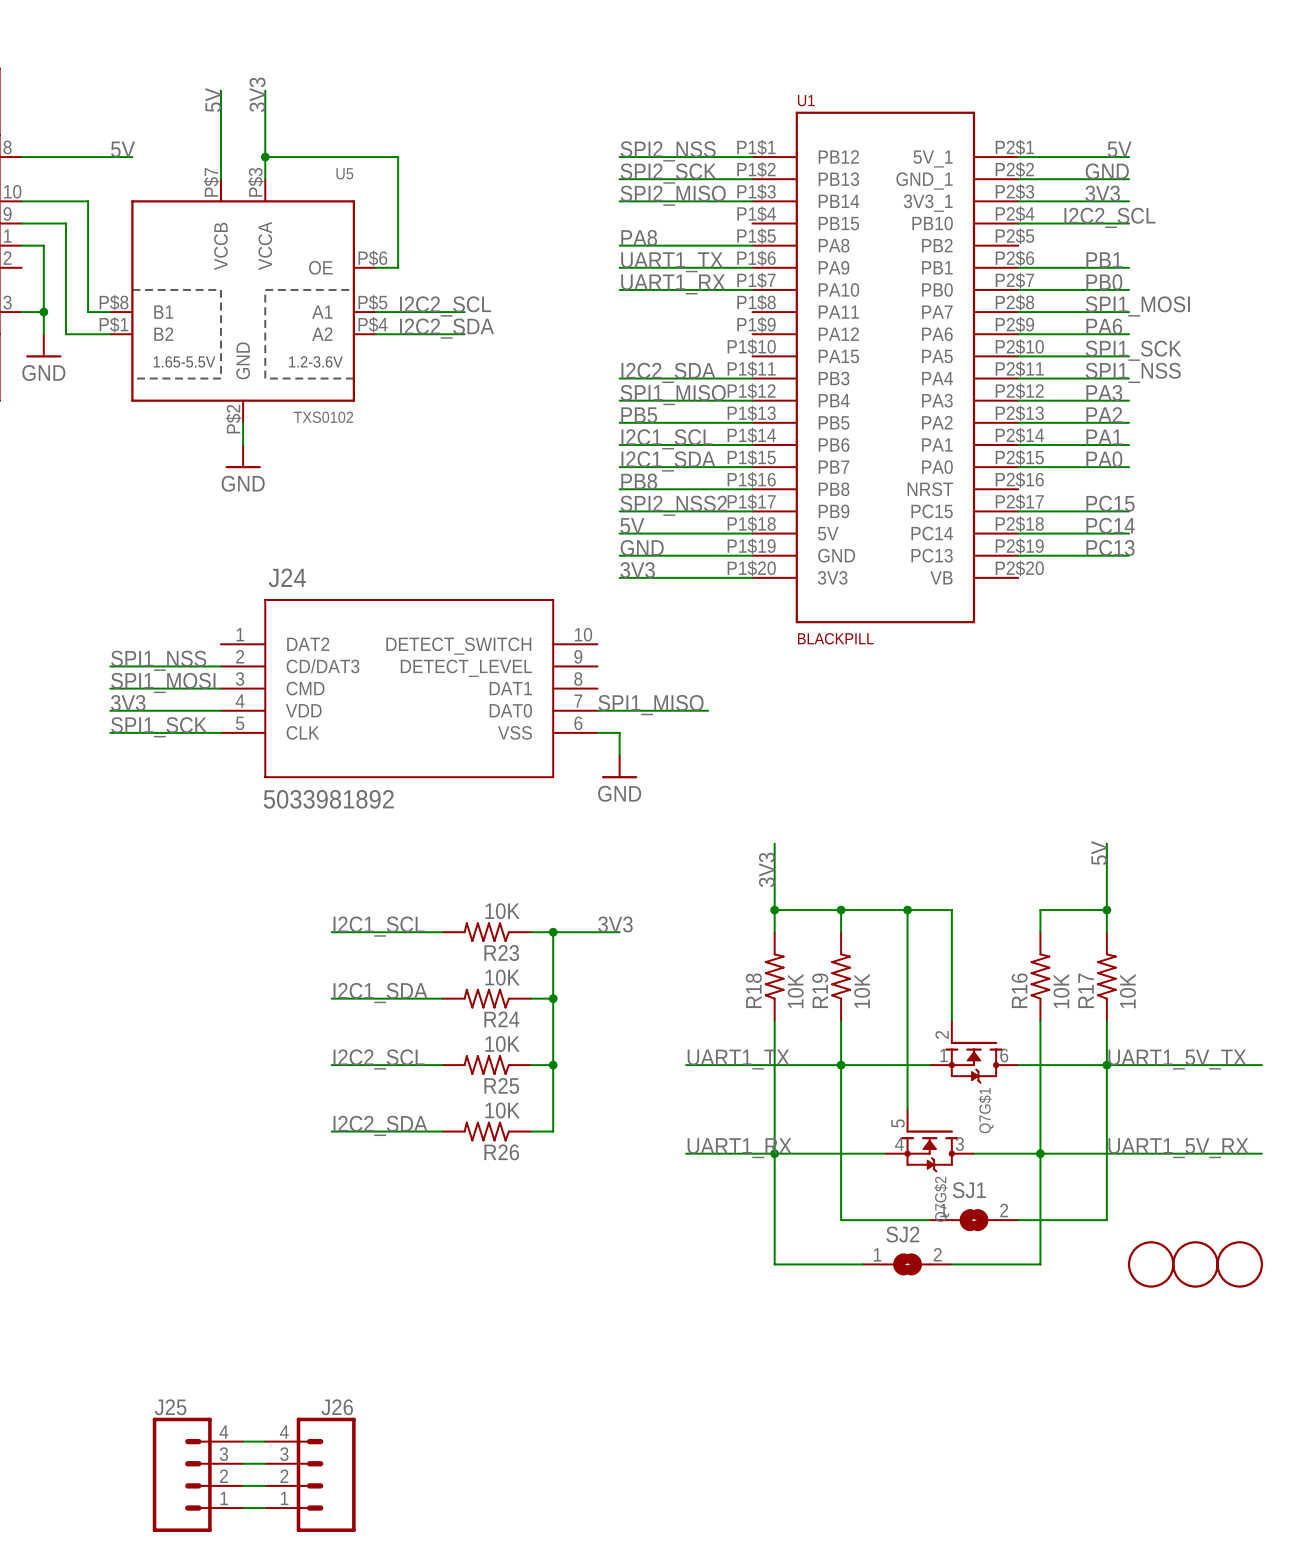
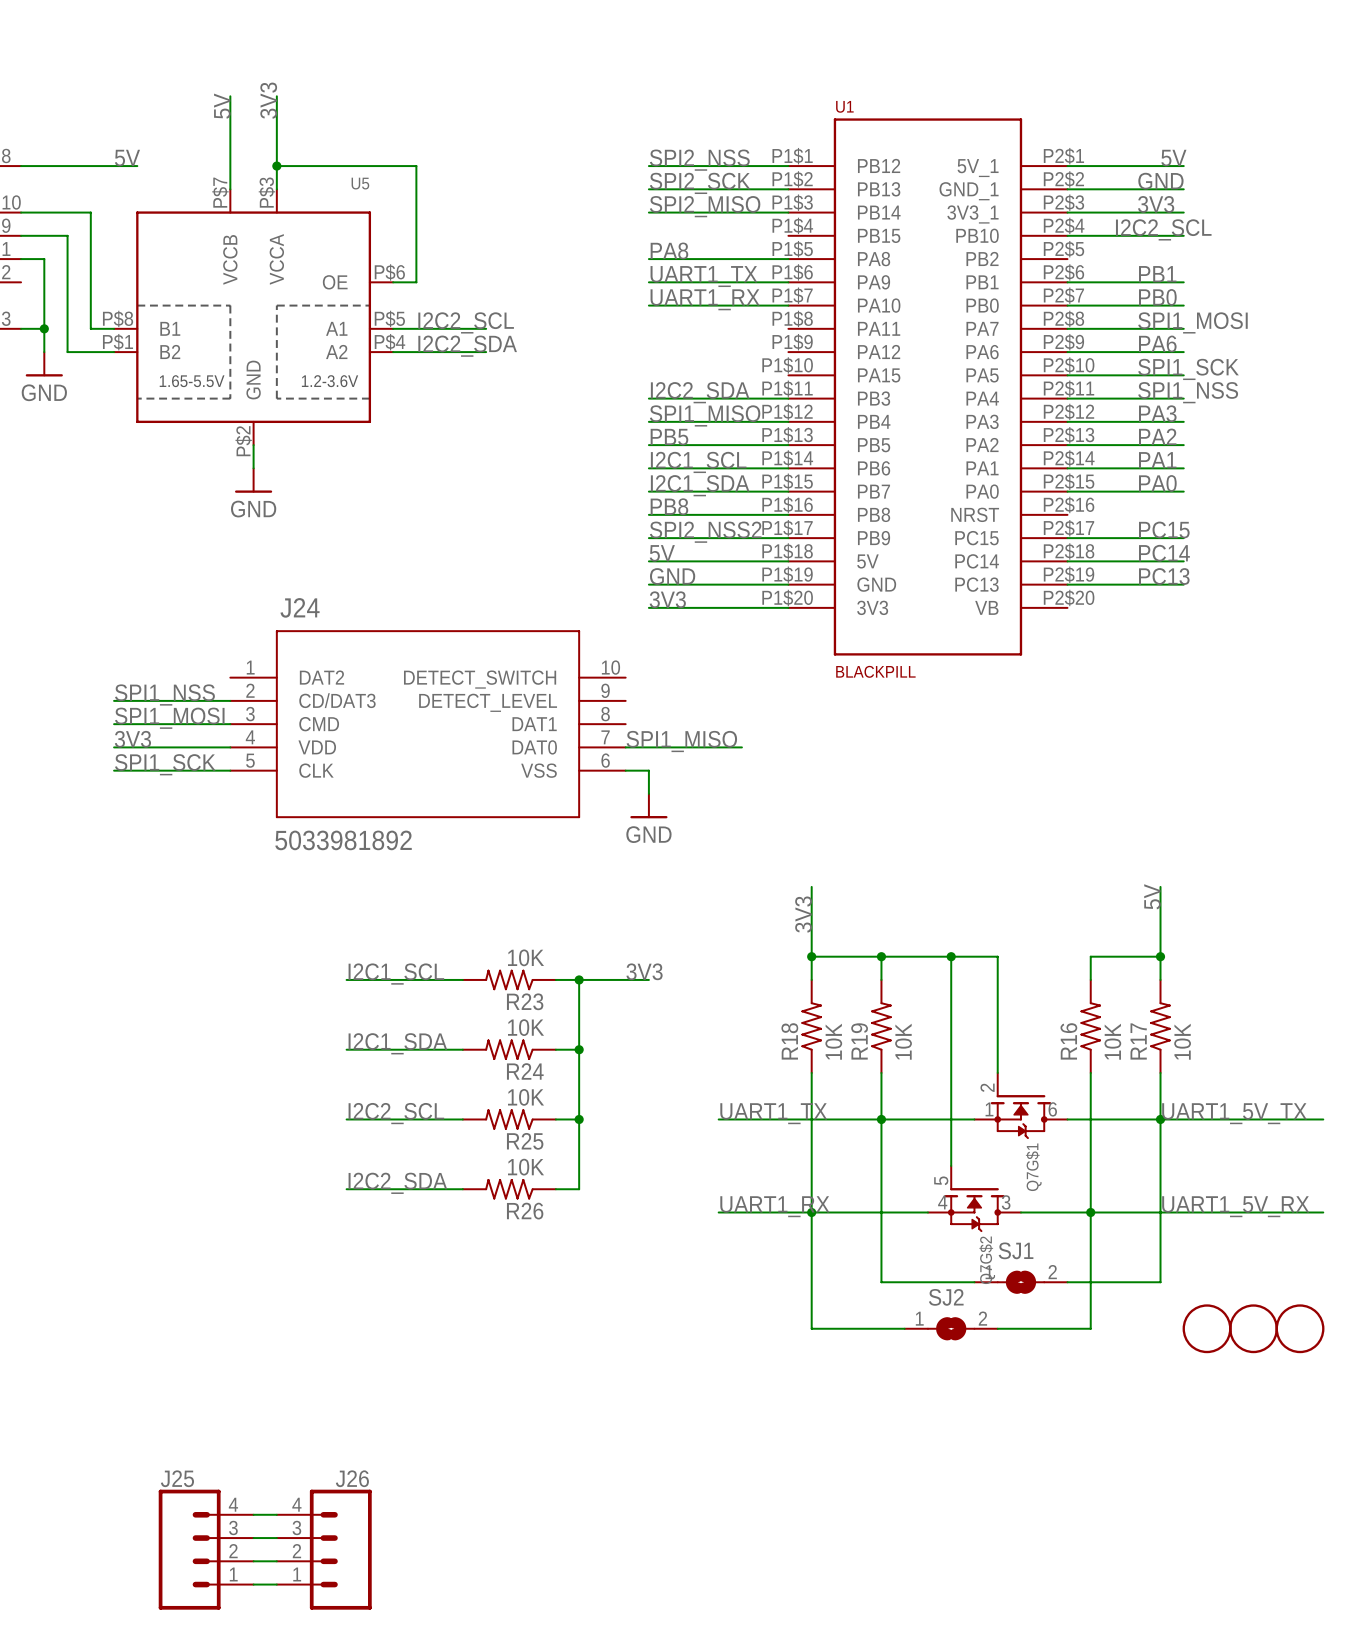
U5 value: TXS0102 (323, 417) -> none

